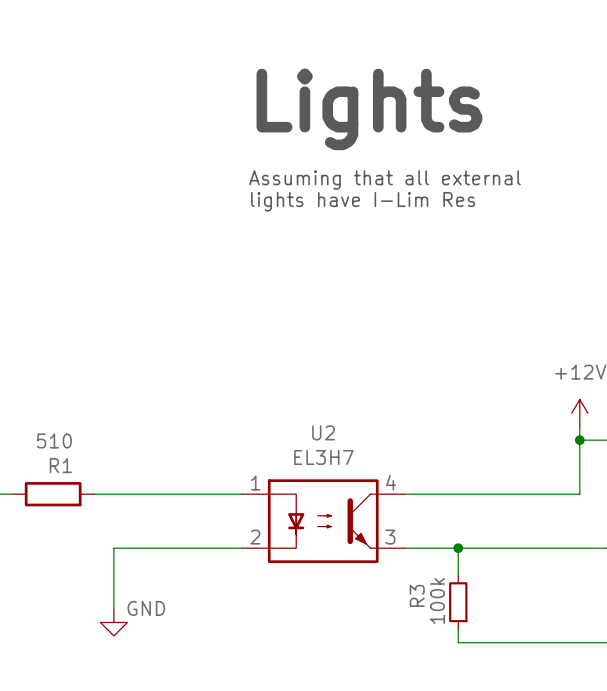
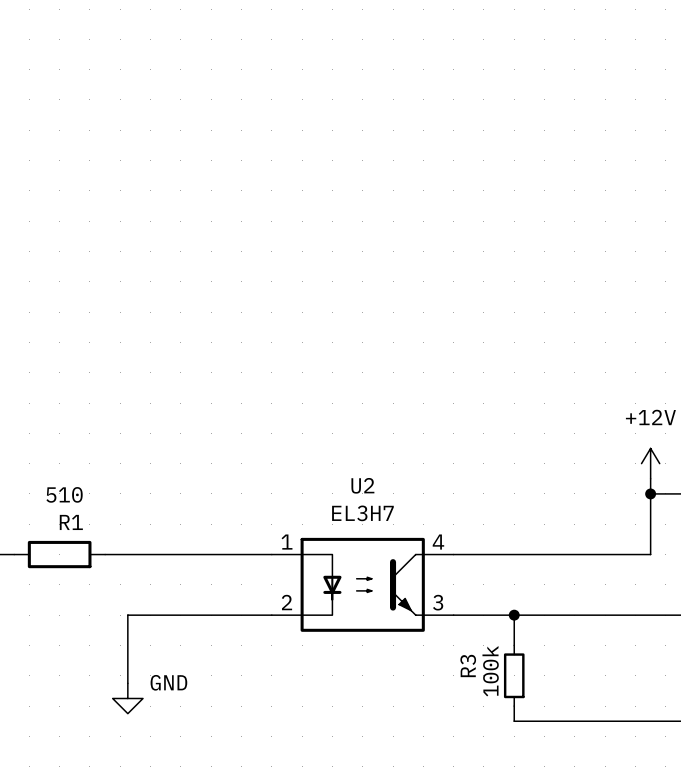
text: Lights (369, 109) -> none
text: Assuming that all external (385, 180) -> none
text: lights have I-Lim Res (363, 201) -> none

